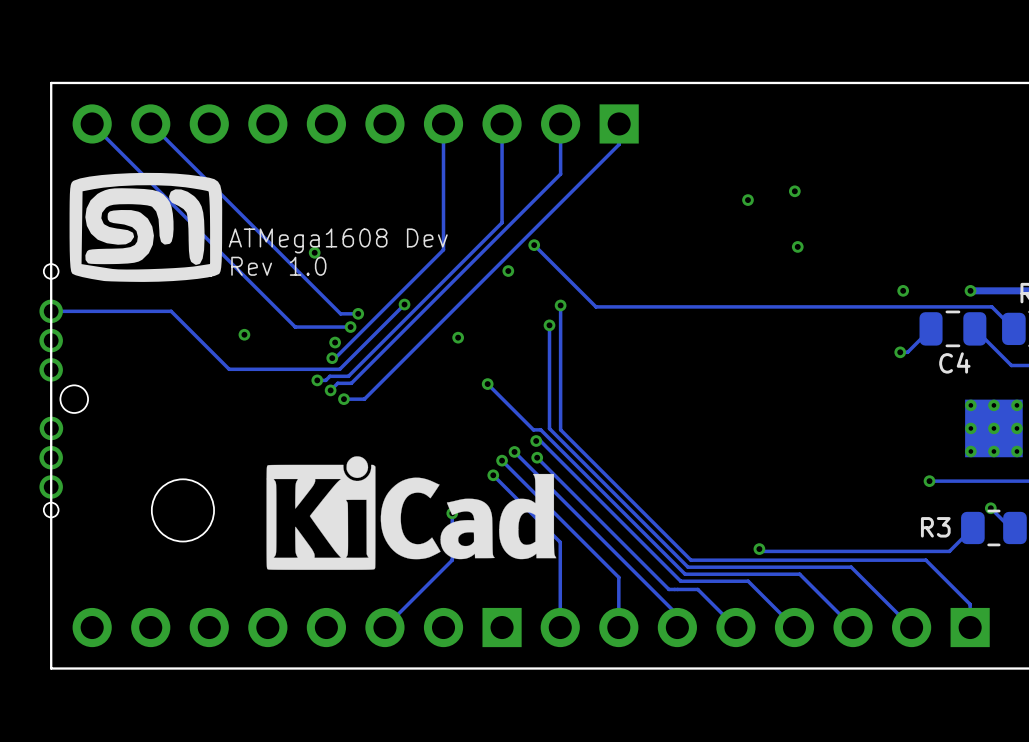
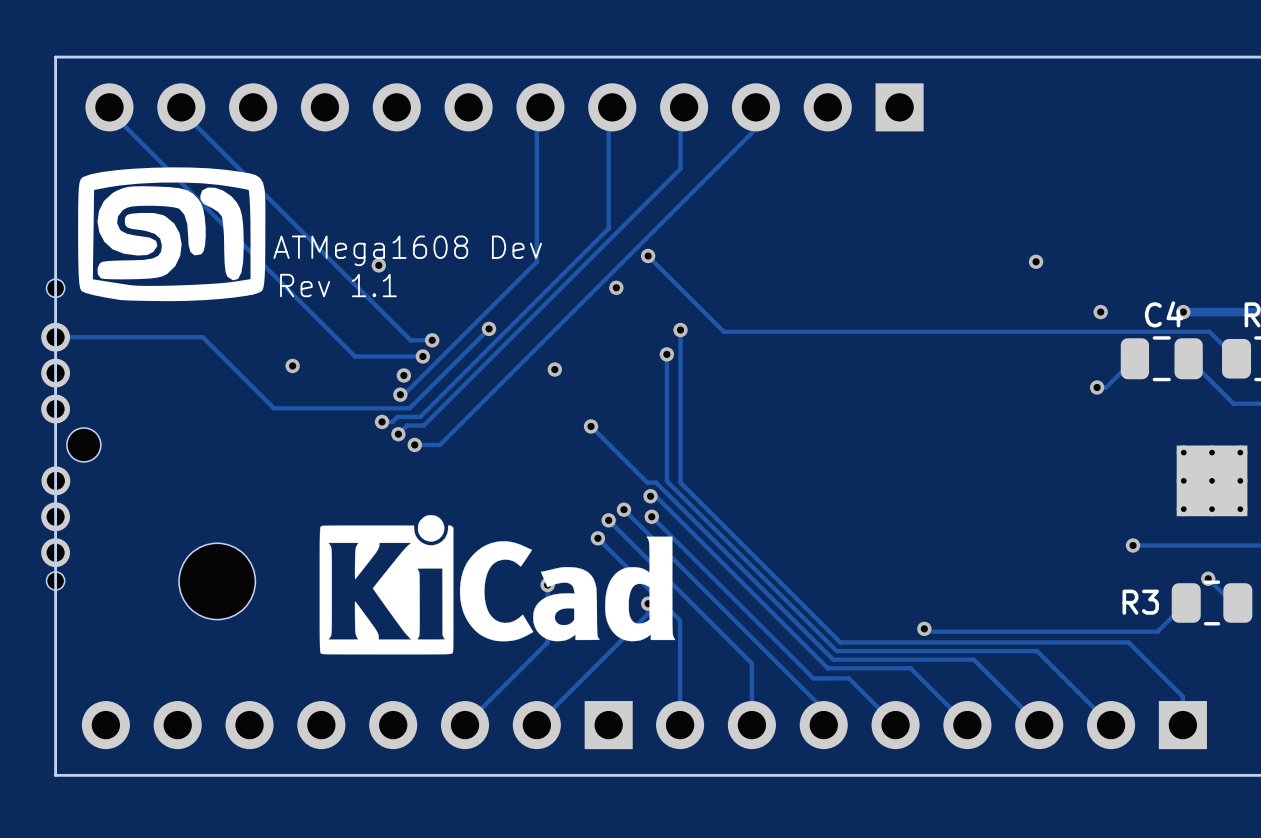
part: (355, 123) -> none
part: none -> (504, 107)
via: (794, 191) -> none
via: (747, 200) -> none
via: (797, 246) -> none
via: none -> (1036, 261)
text: Rev 1.0 (278, 266) -> Rev 1.1 (338, 285)
C4 name position: C4 (954, 362) -> C4 (1164, 314)
track: none -> (648, 603) (648, 613) (536, 725)
via: none -> (648, 603)

